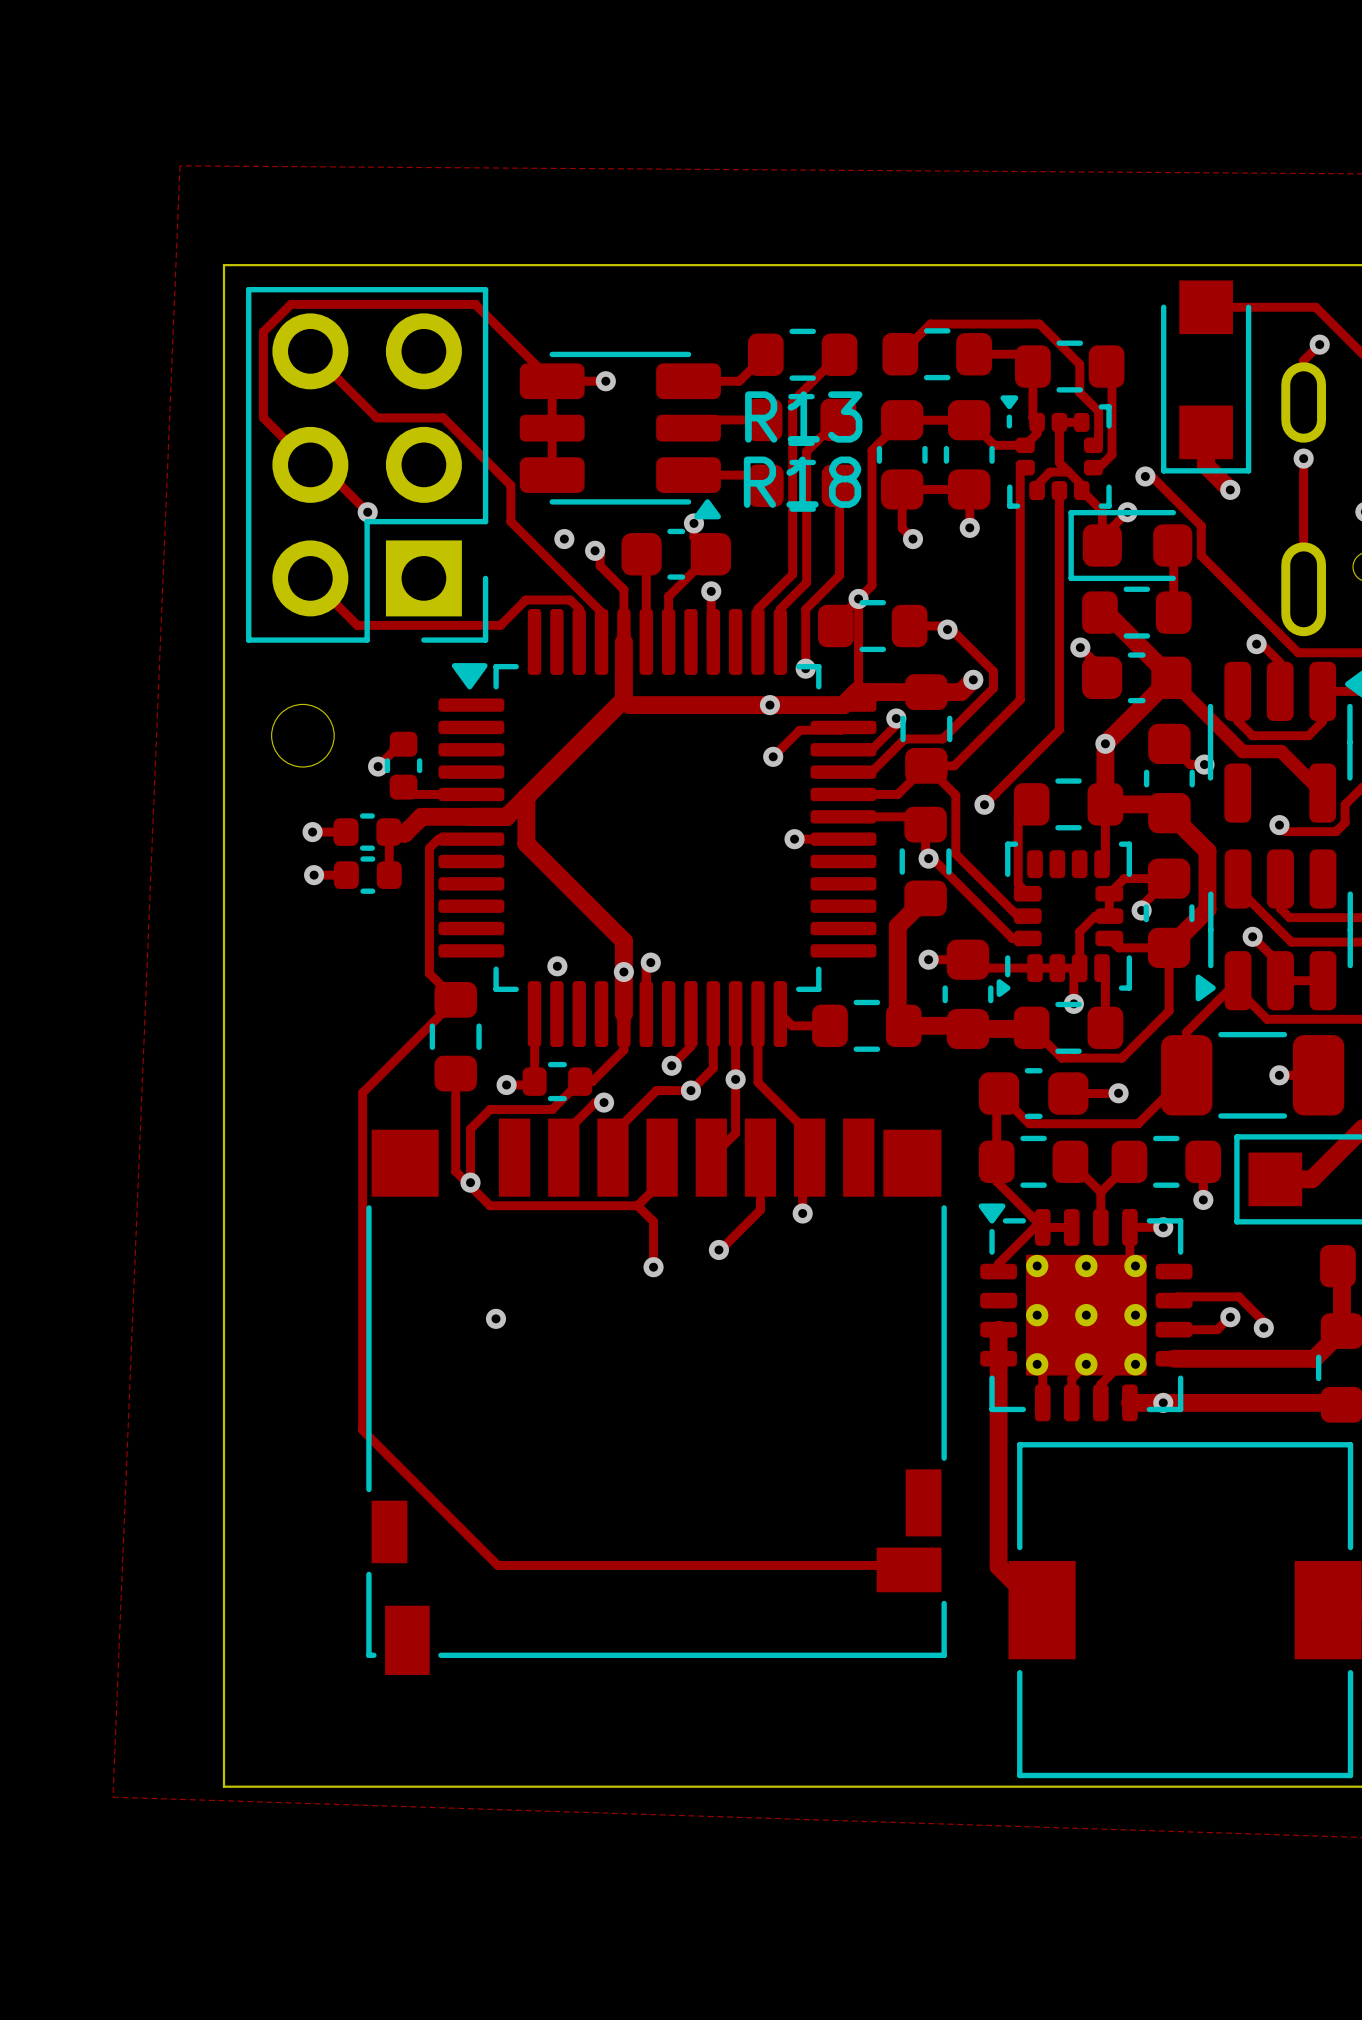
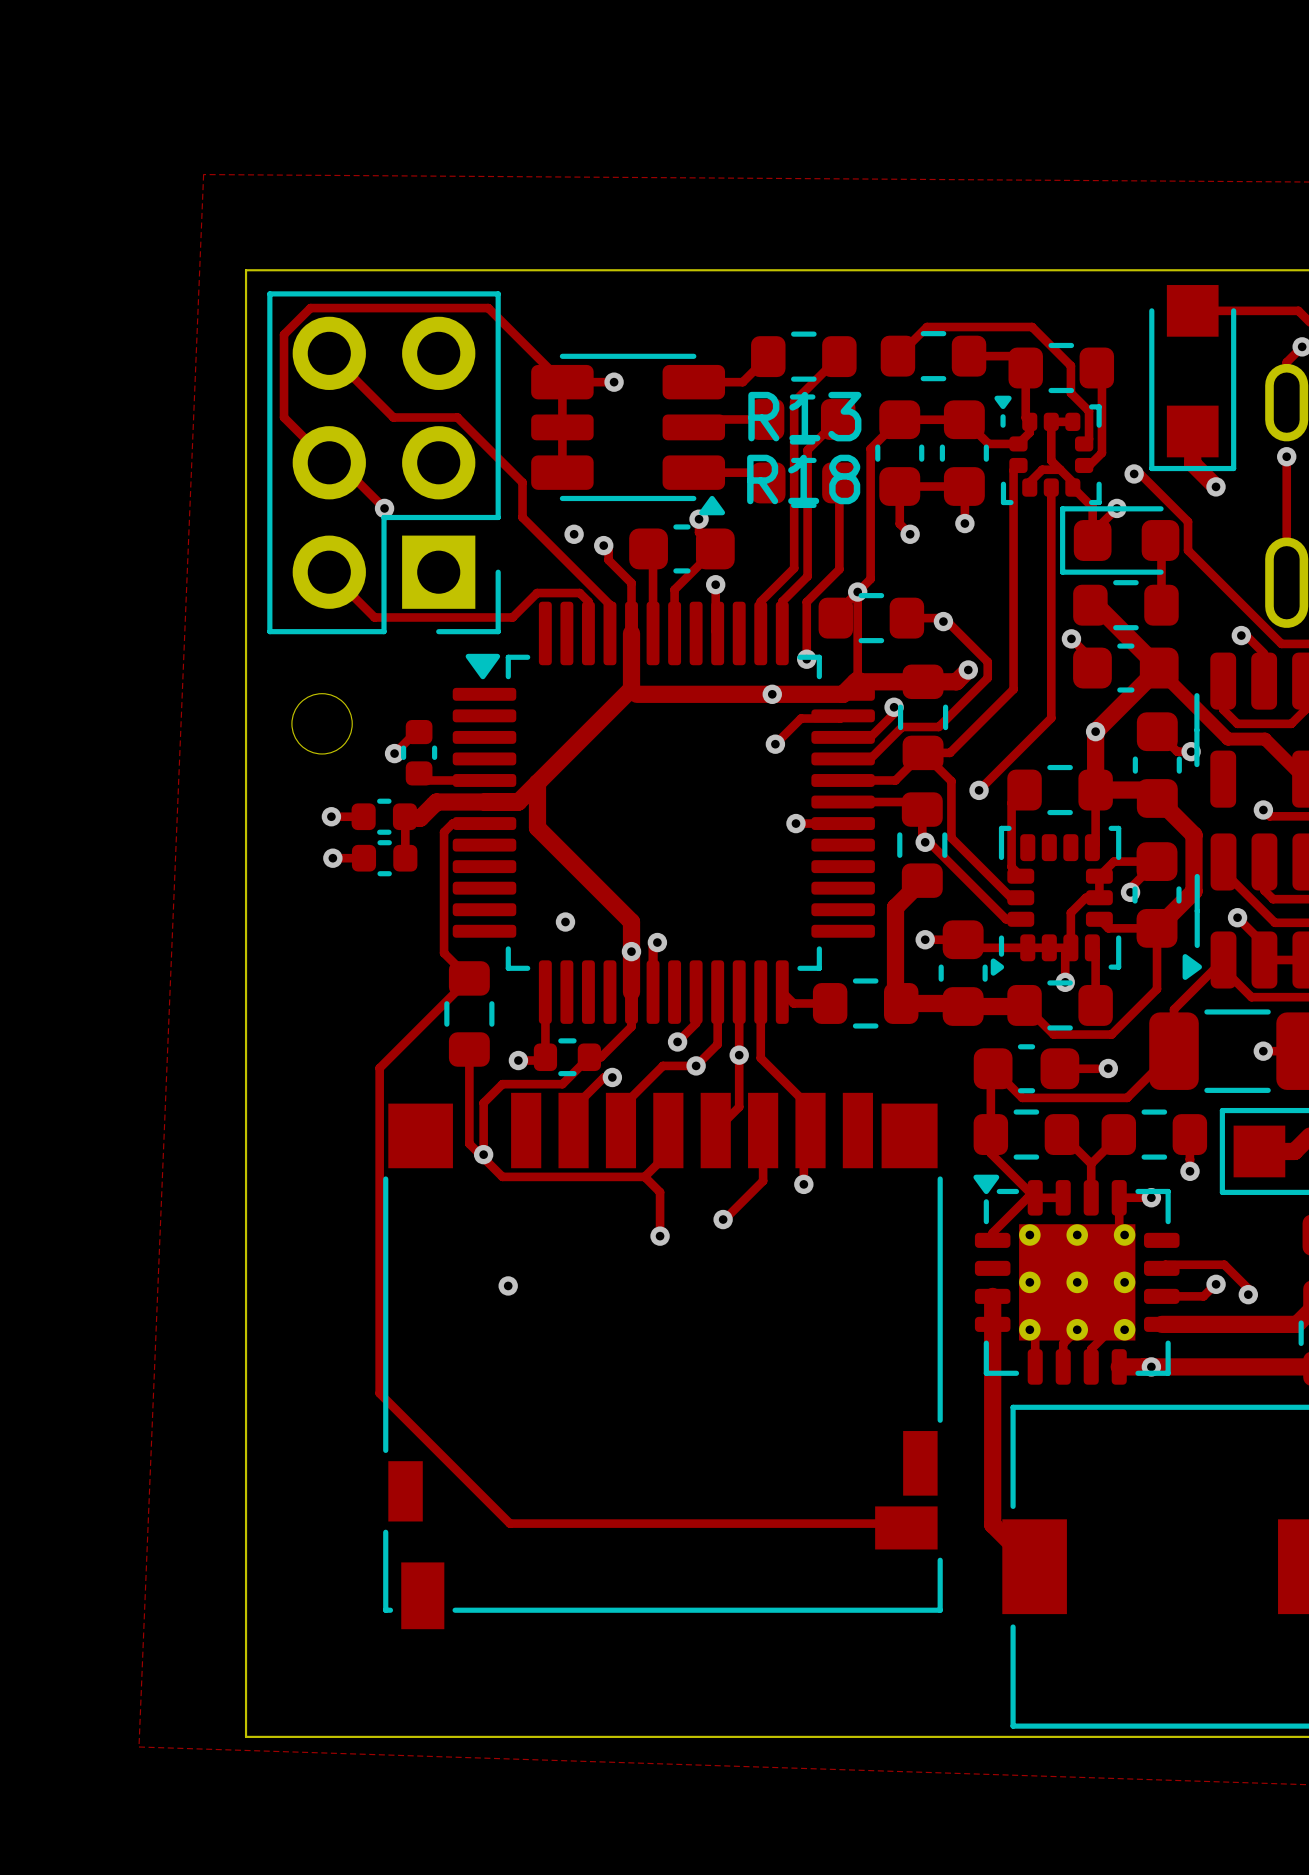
via position: (557, 966) -> (565, 922)

